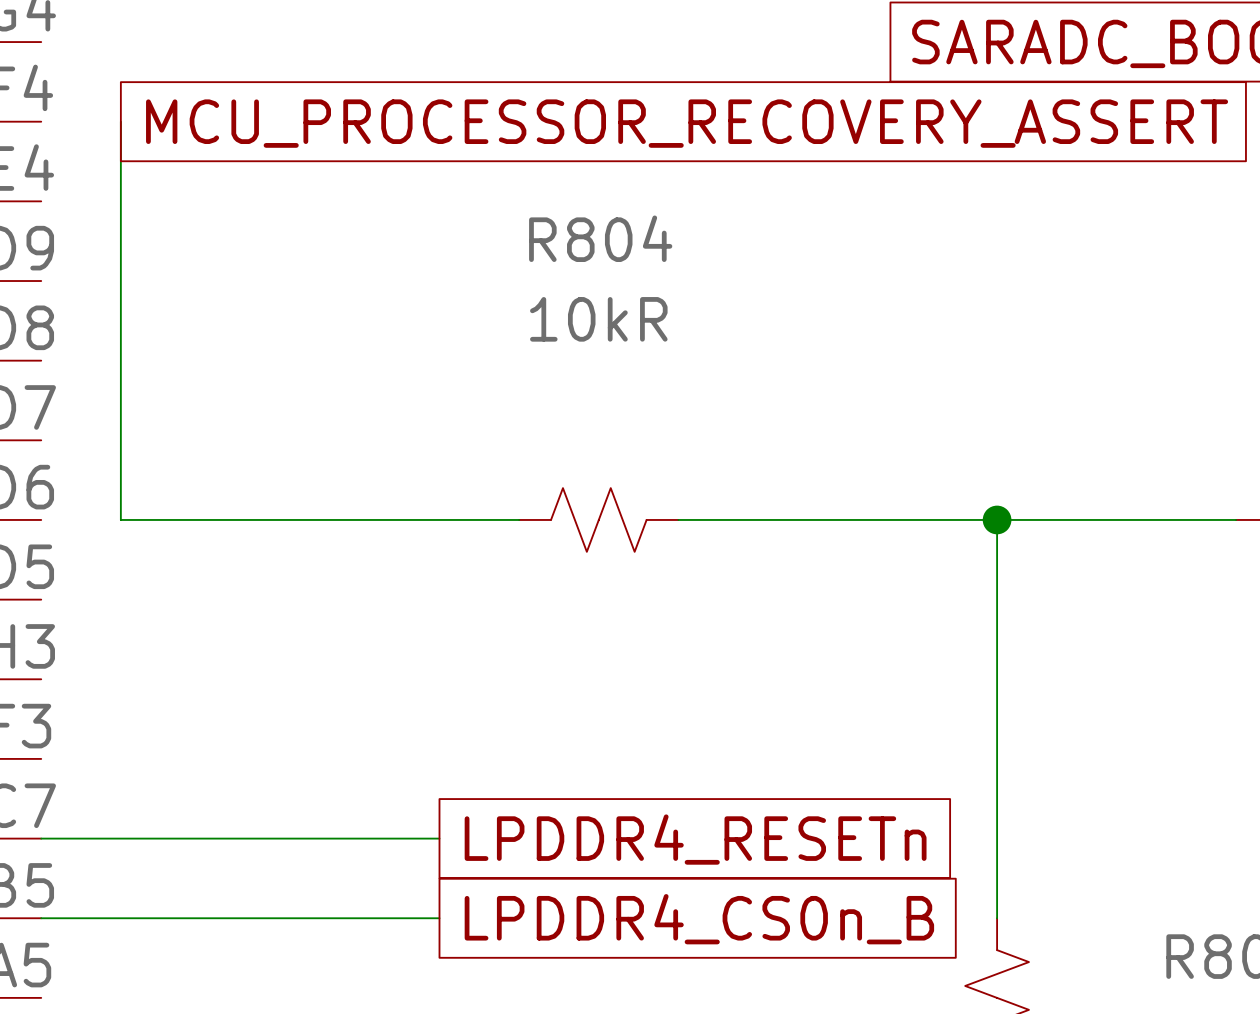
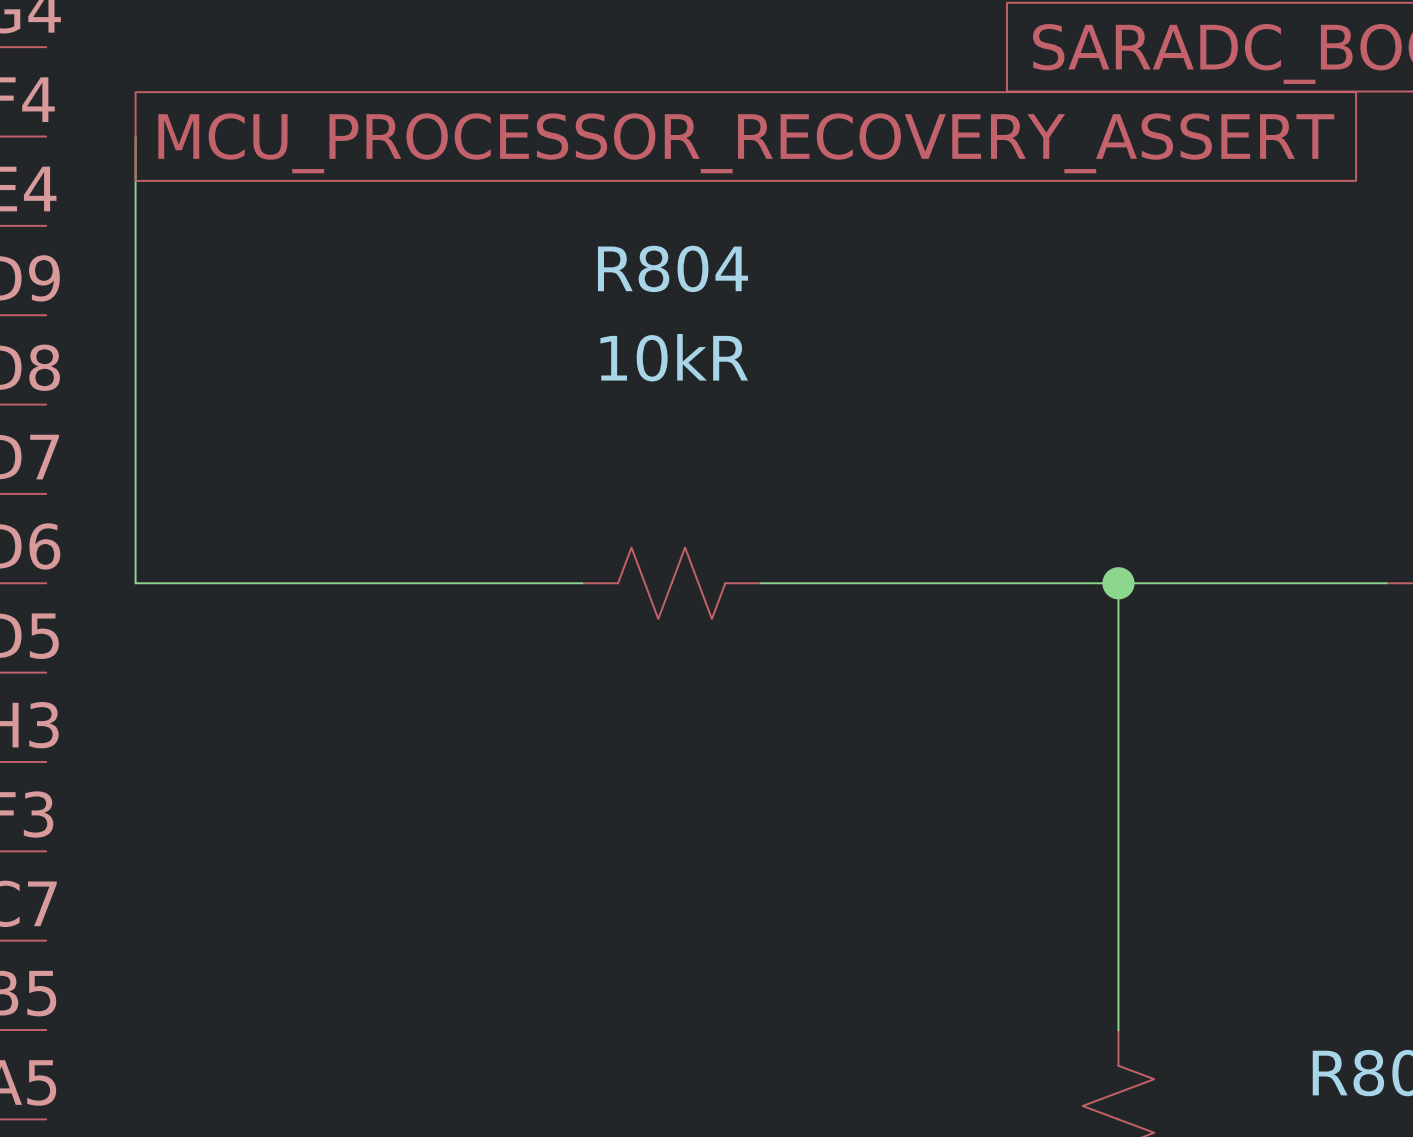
wire: (41, 838) (439, 838) -> none
global label: LPDDR4_RESETn (695, 839) -> none
wire: (41, 918) (439, 918) -> none
global label: LPDDR4_CS0n_B (699, 919) -> none

